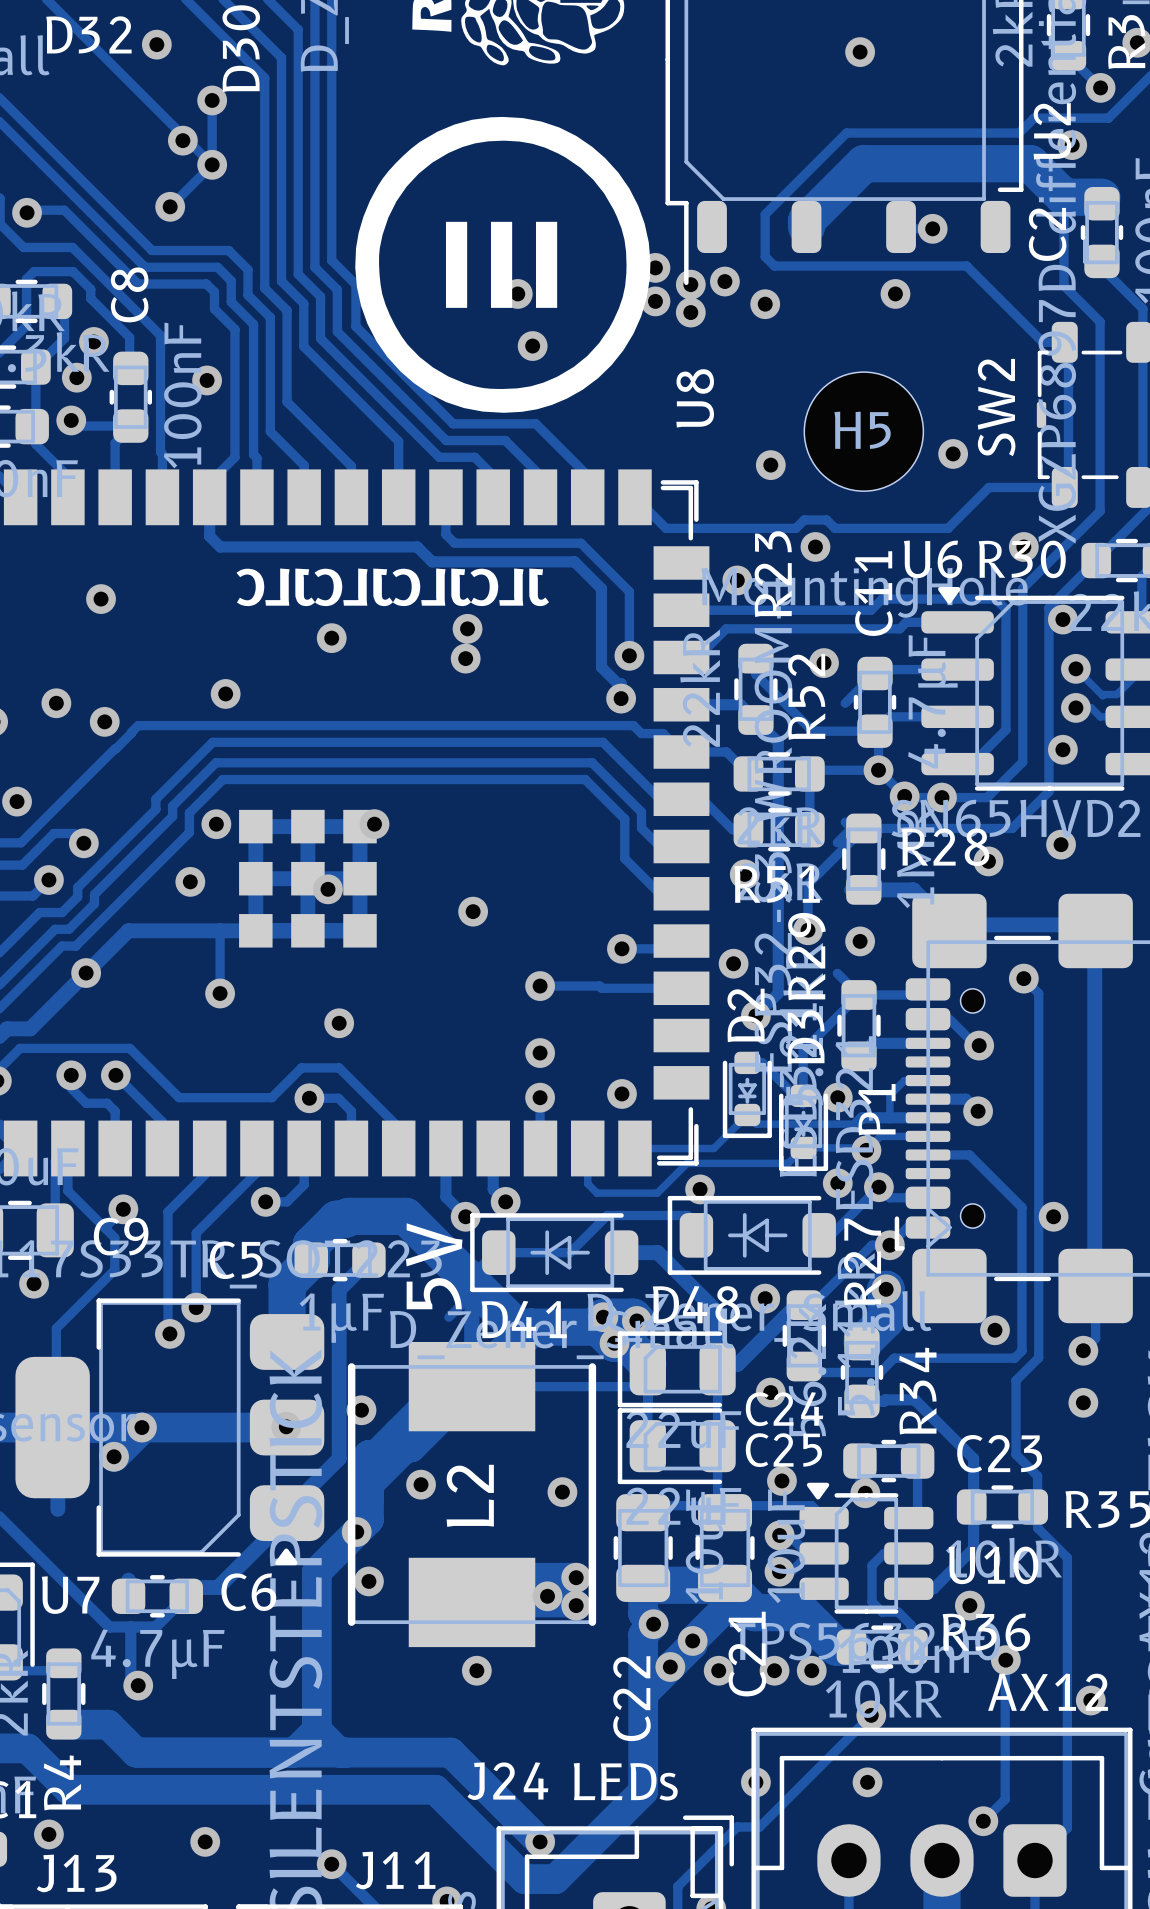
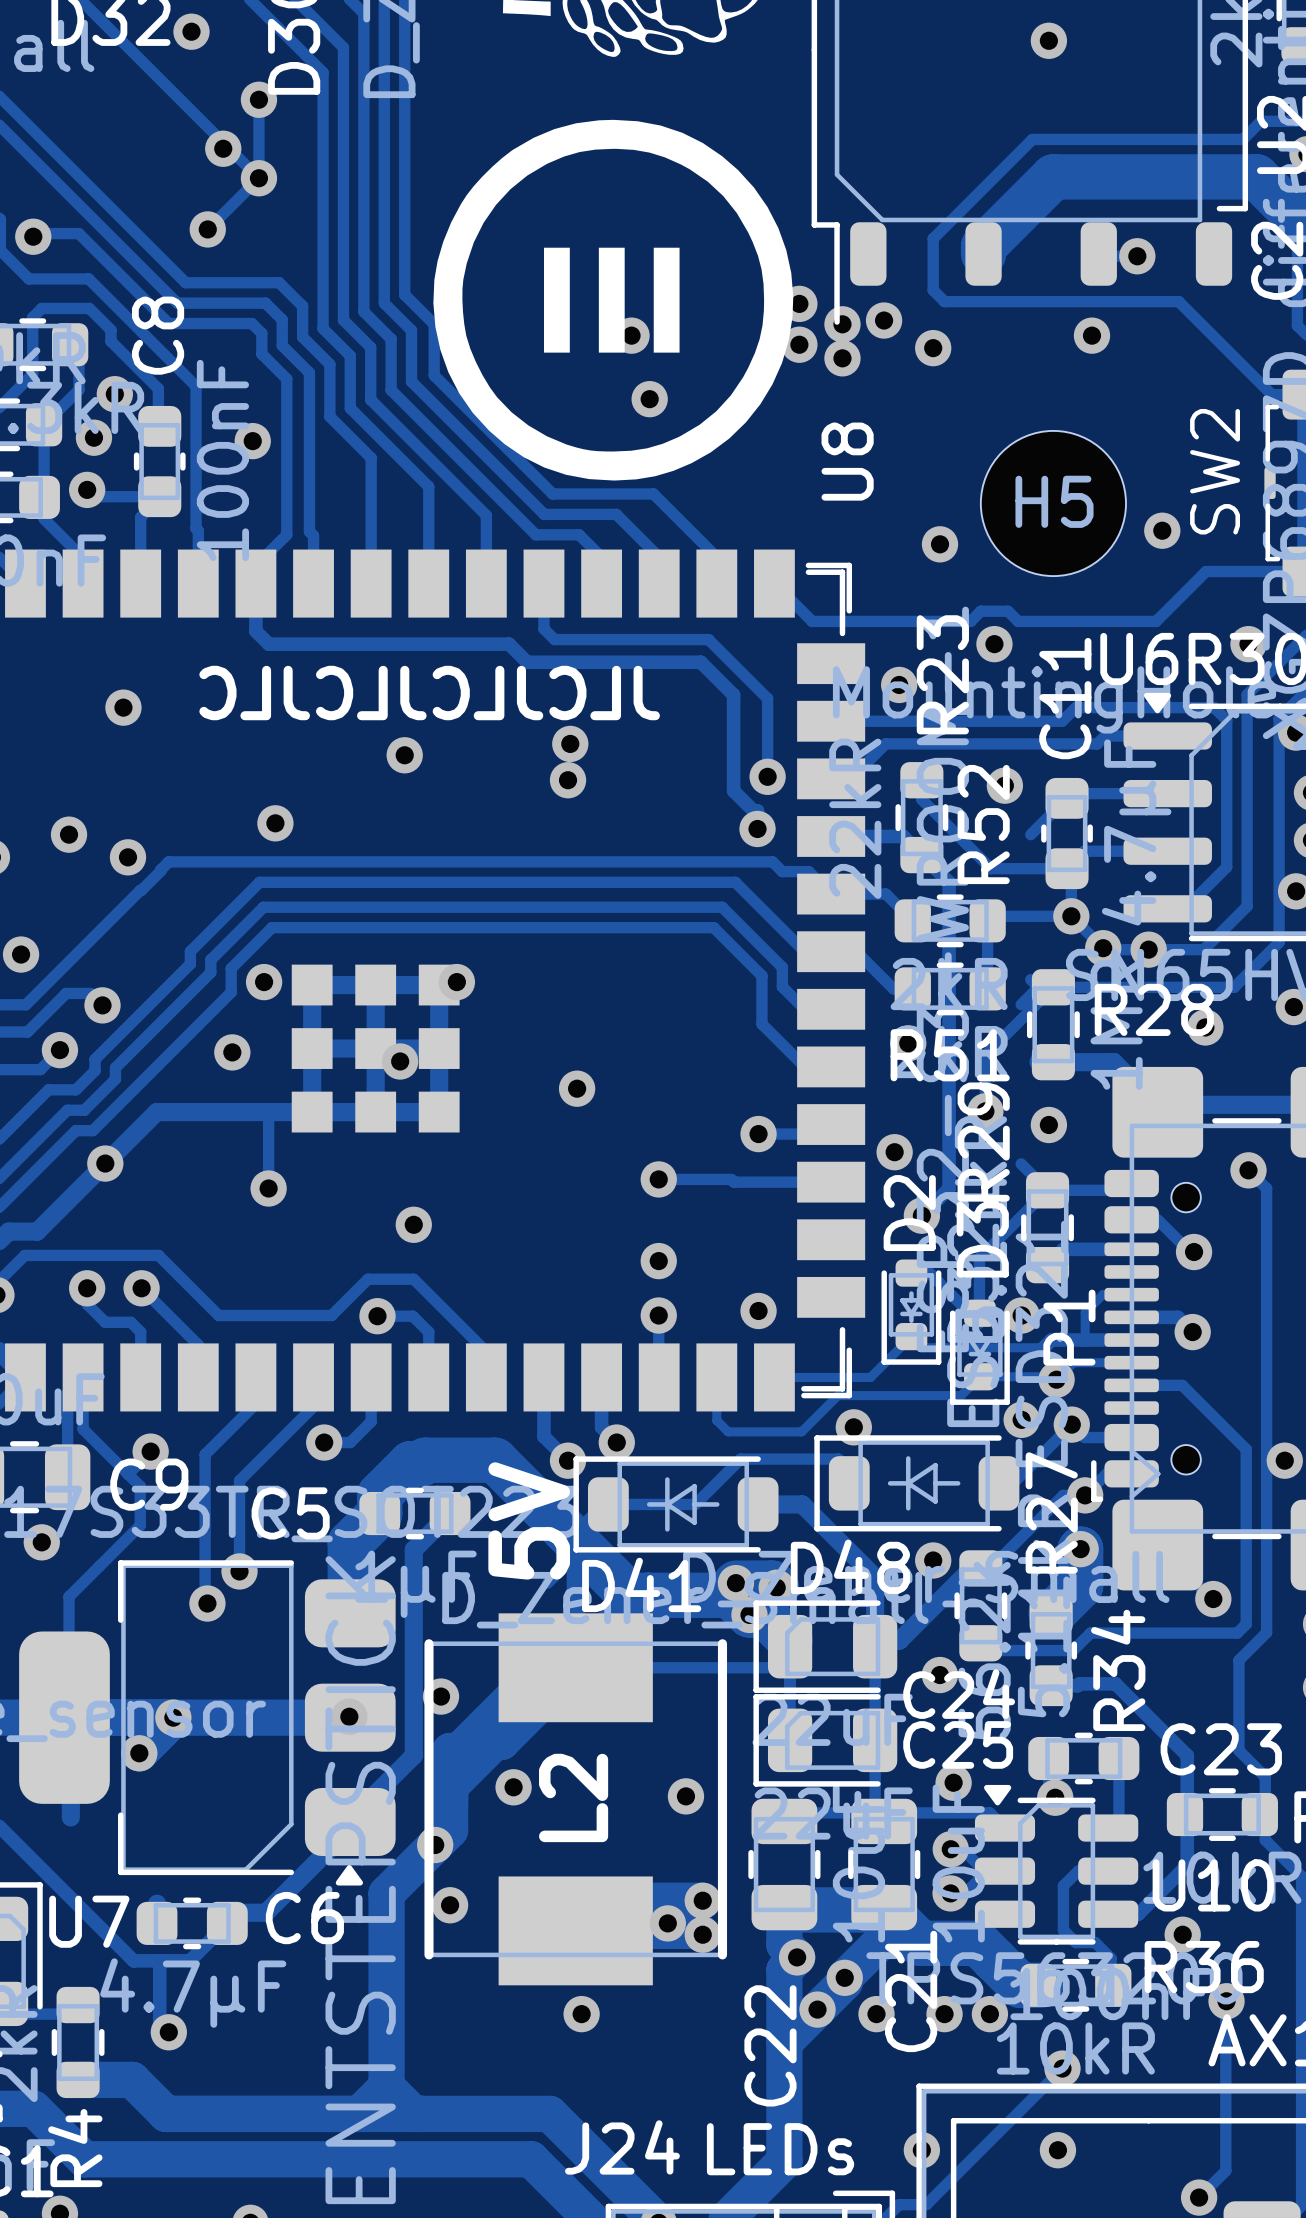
track: (287, 353) (287, 401) (351, 466) -> (350, 408) (428, 486) (428, 545)
track: (270, 360) (270, 431) (304, 465) -> (329, 416) (371, 457) (371, 544)

